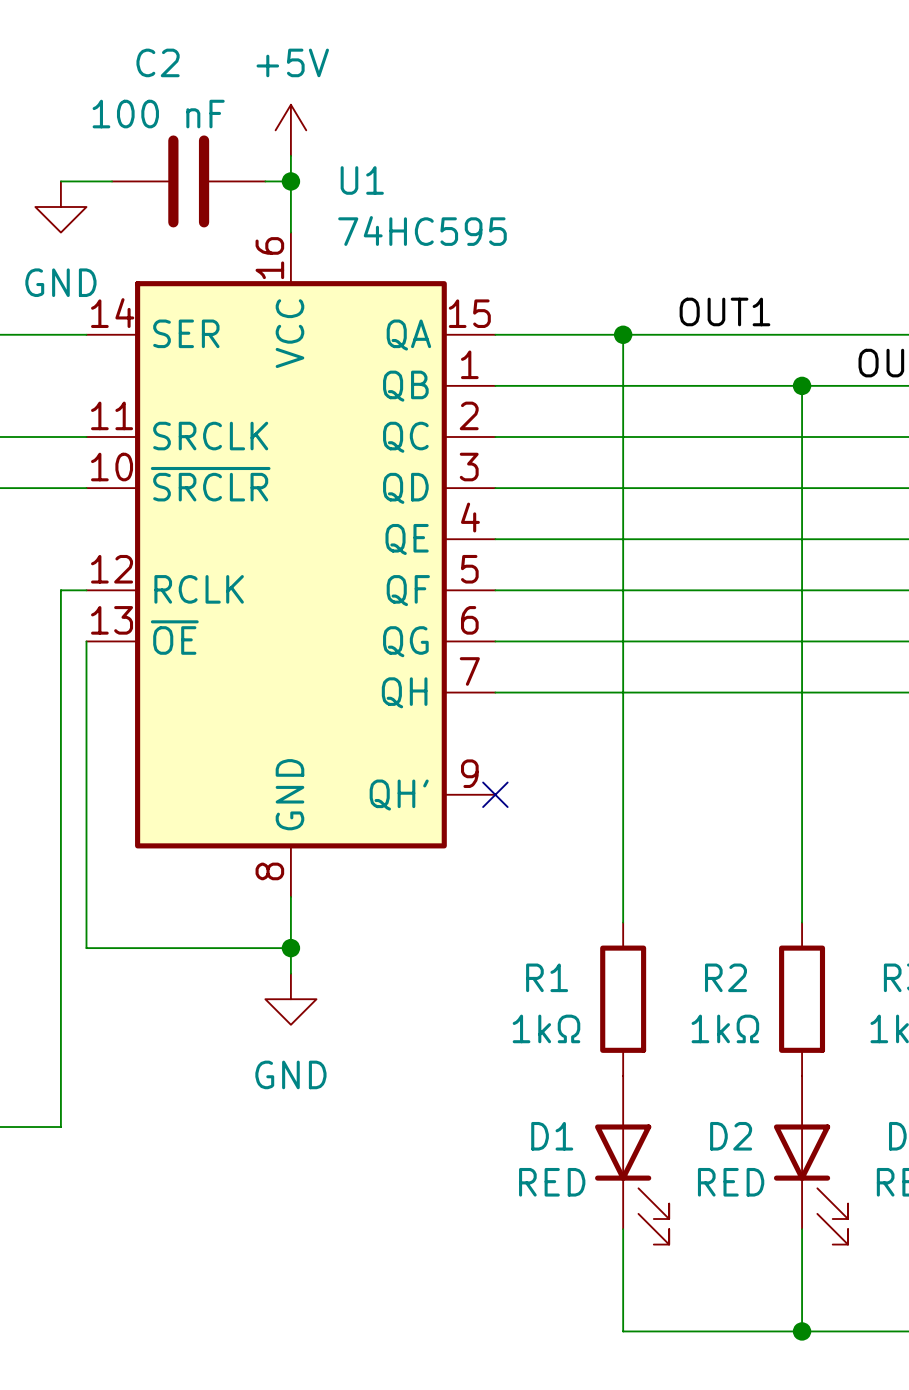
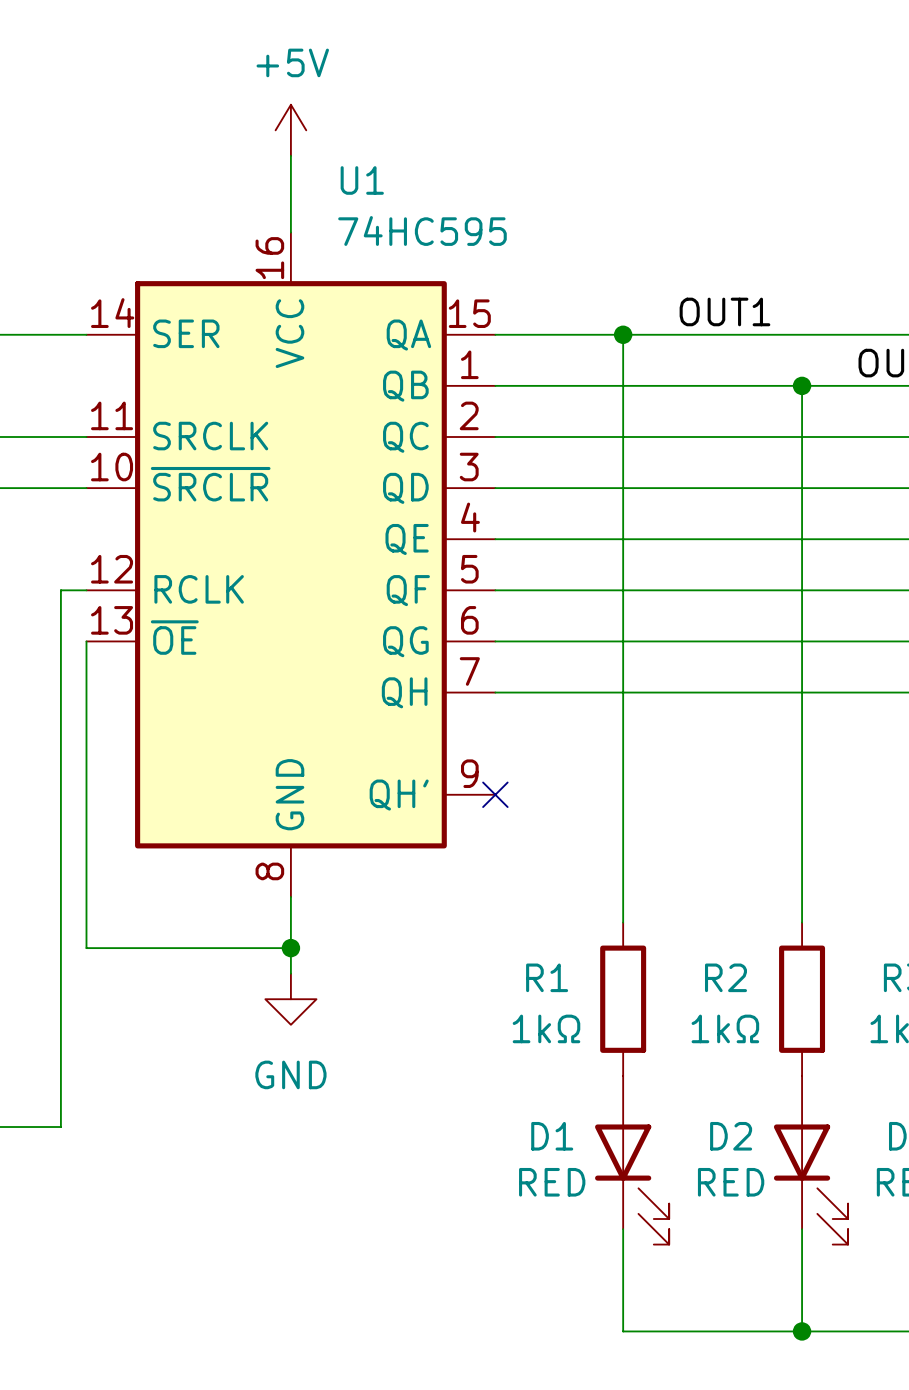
wire: (60, 181) (112, 181) -> none
C2: 100 nF (188, 181) -> none
wire: (265, 181) (290, 181) -> none
junction: (290, 181) -> none
power symbol: GND (60, 206) -> none

